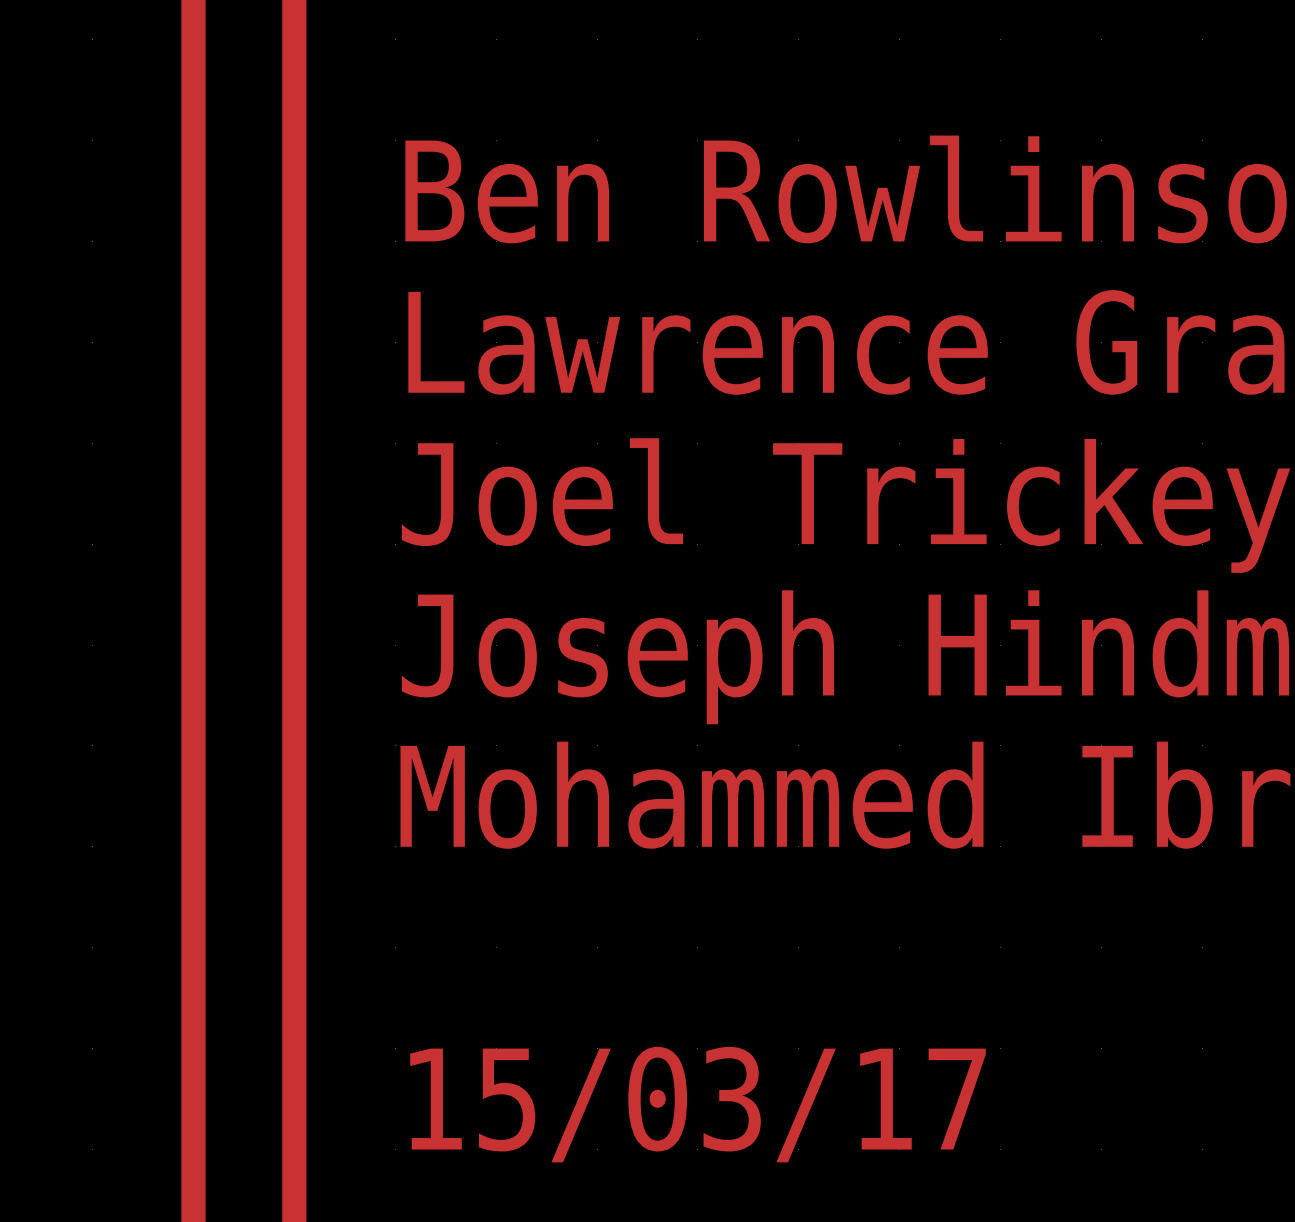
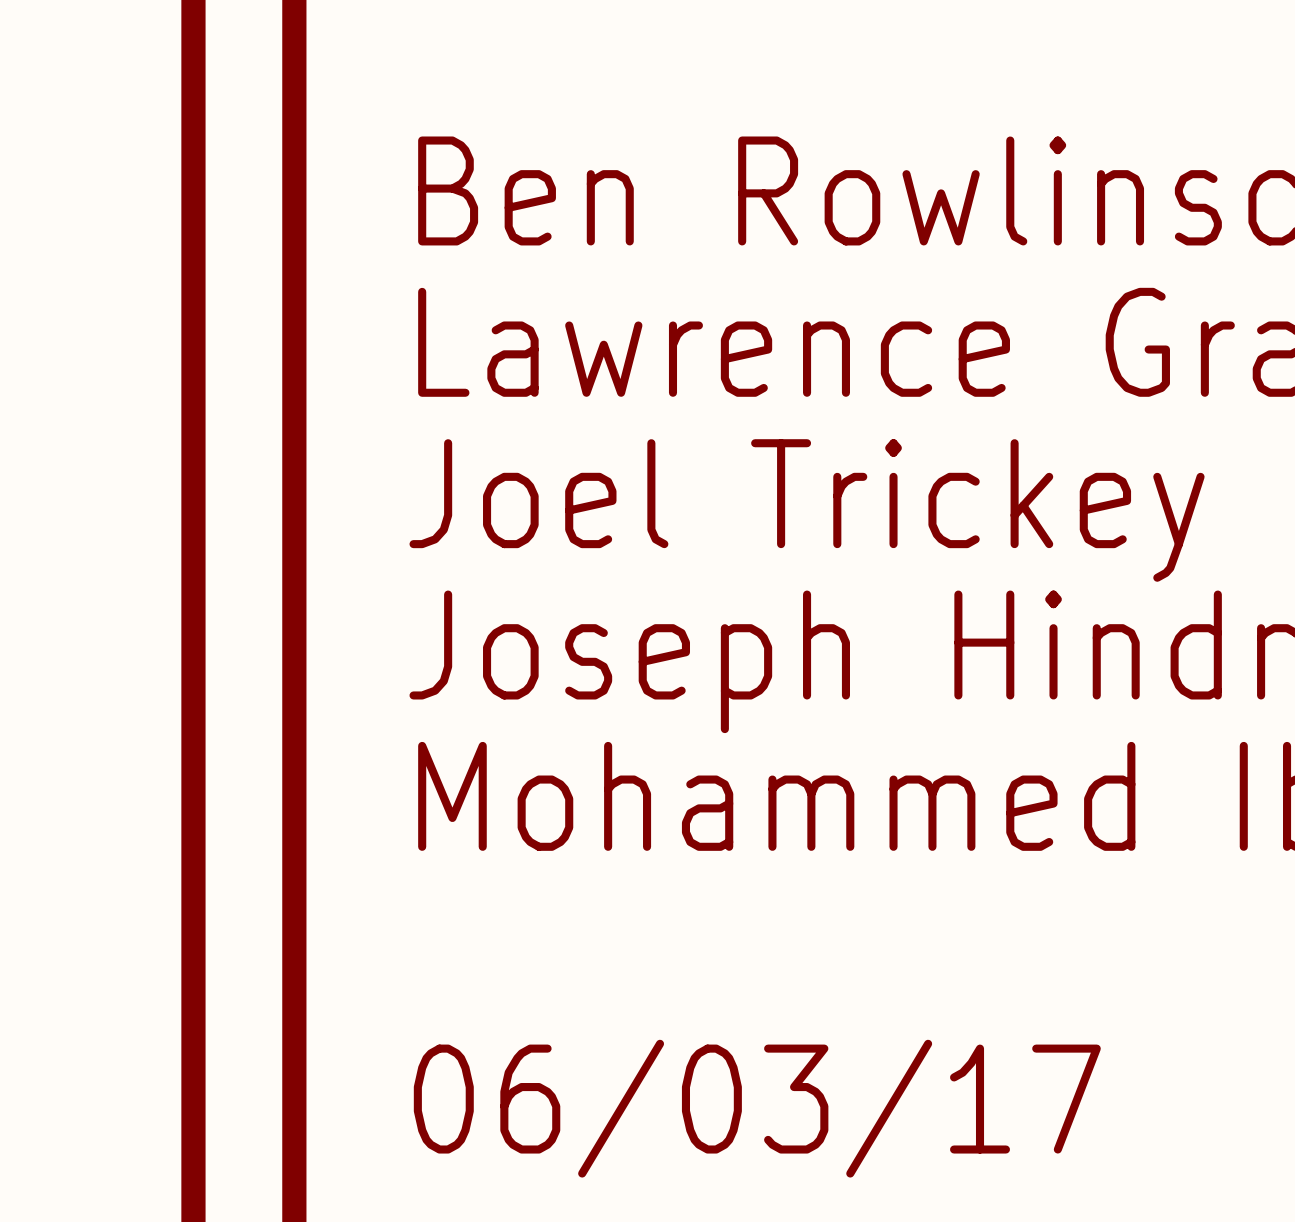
text: 15/03/17 (698, 1104) -> 06/03/17 (757, 1108)

